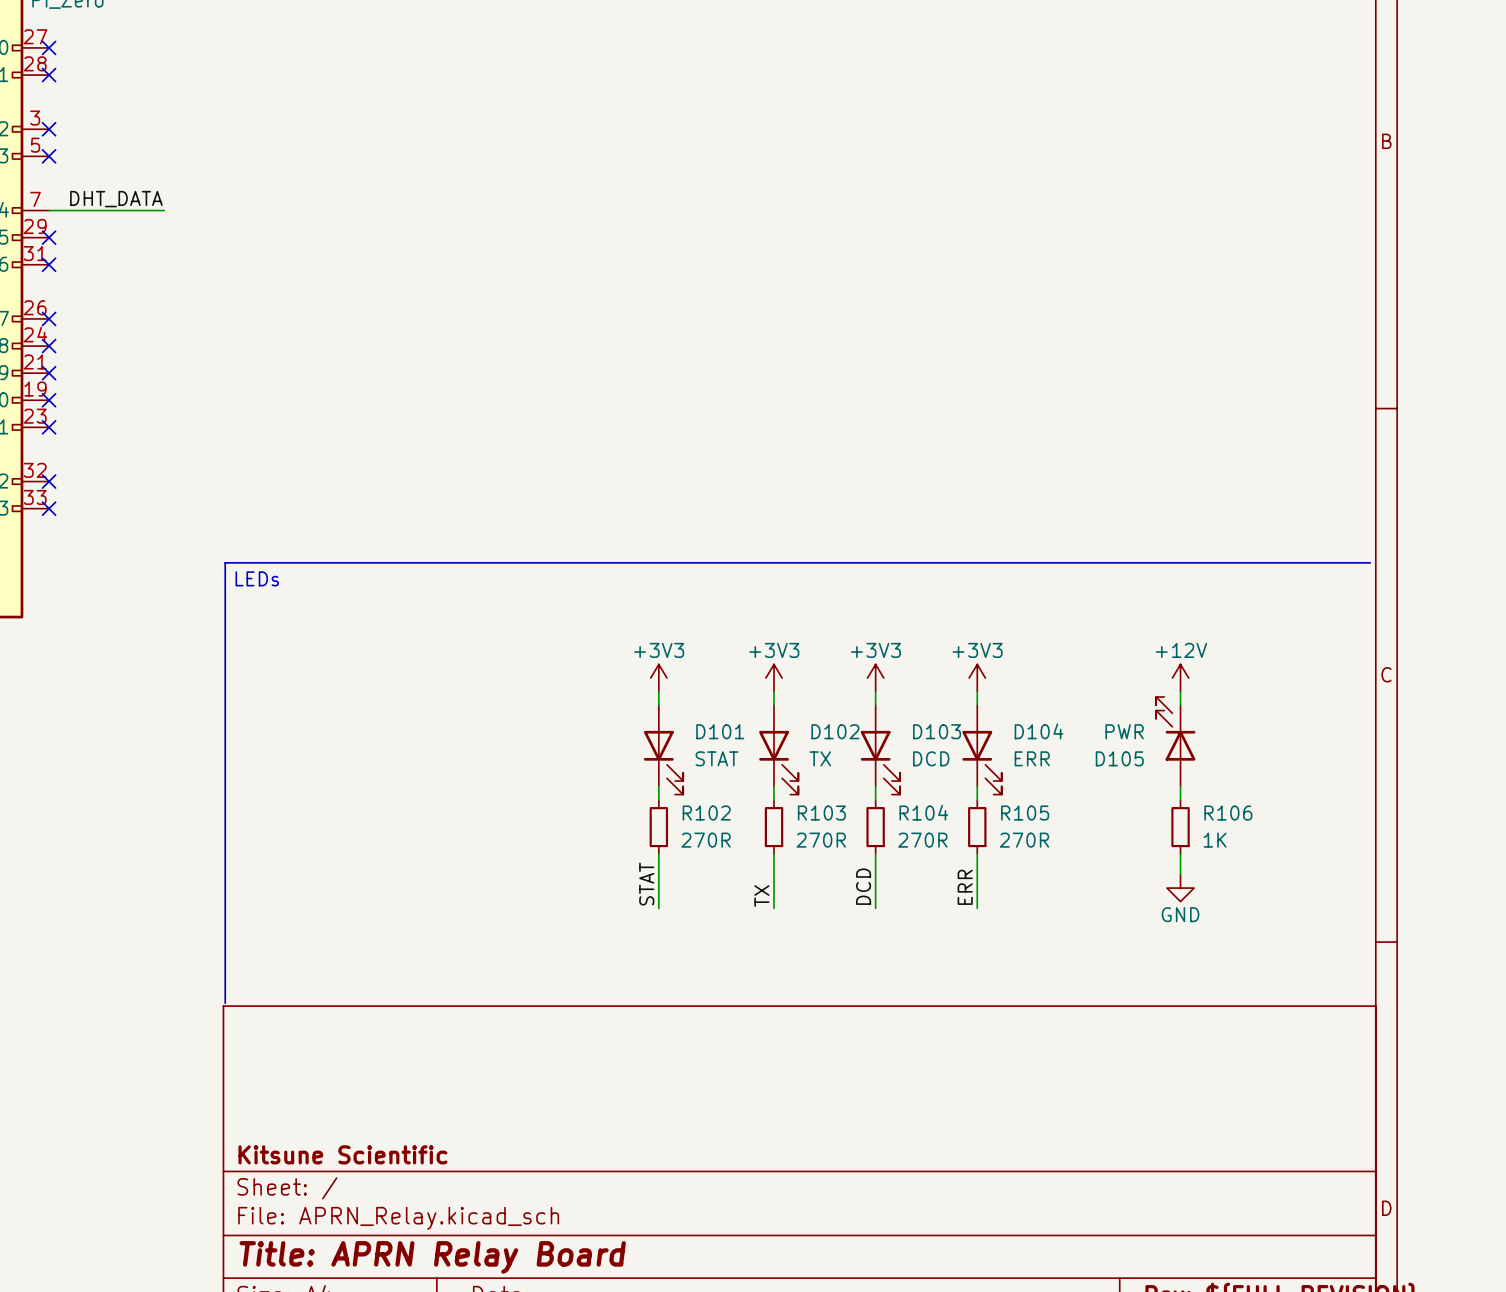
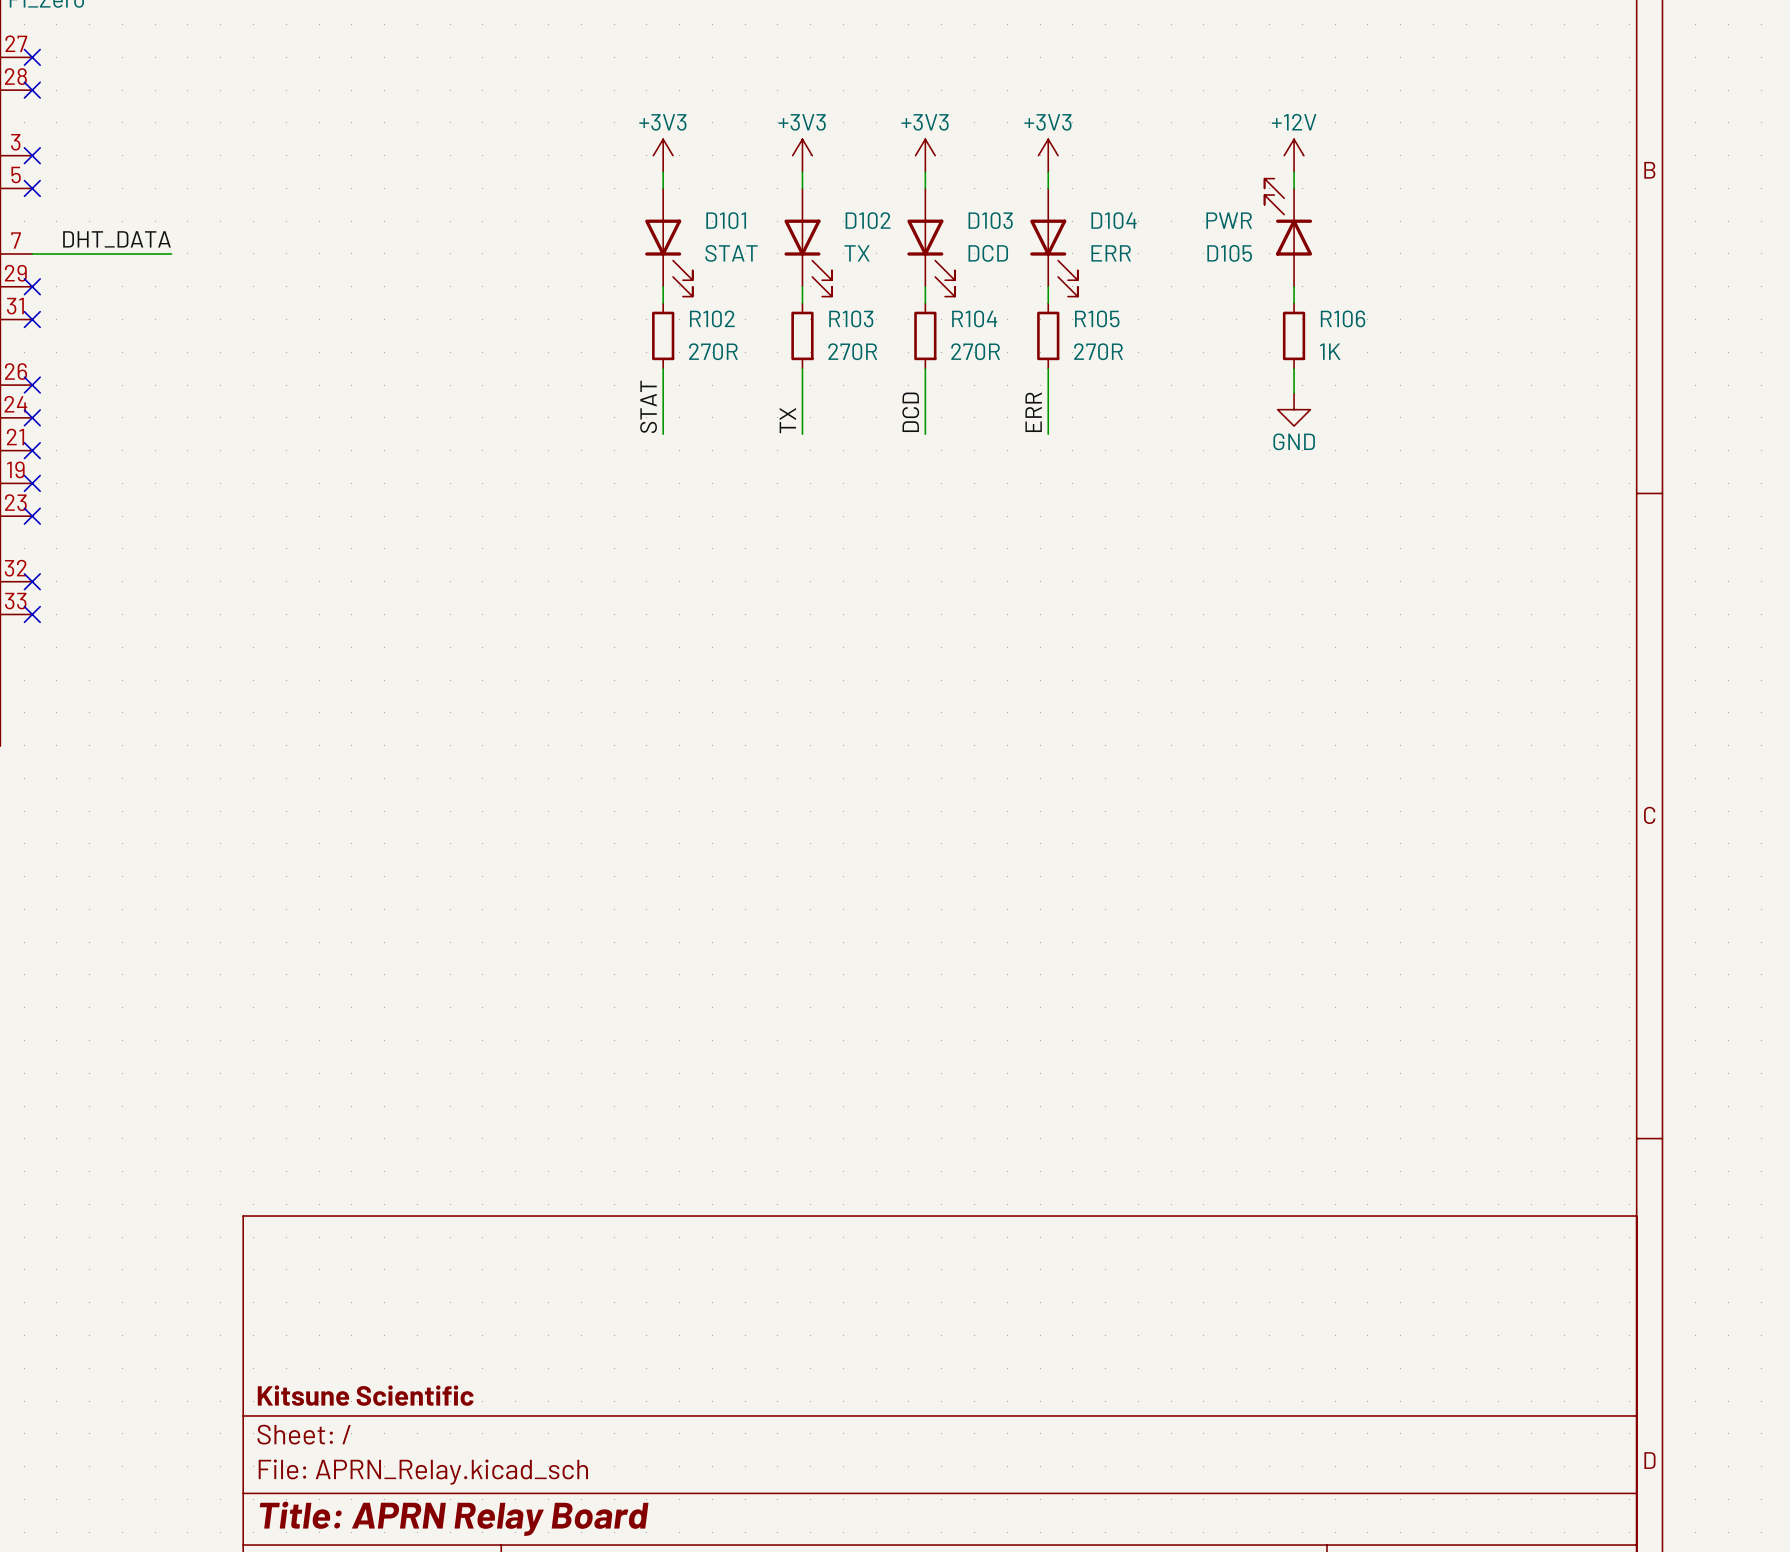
power symbol: none -> +3V3 (663, 155)
power symbol: none -> +3V3 (802, 155)
power symbol: none -> +3V3 (925, 155)
power symbol: none -> +3V3 (1048, 155)
power symbol: none -> +12V (1294, 155)
wire: none -> (663, 172) (663, 188)
wire: none -> (802, 172) (802, 188)
wire: none -> (925, 172) (925, 188)
wire: none -> (1048, 172) (1048, 188)
wire: none -> (1294, 172) (1294, 188)
wire: none -> (663, 286) (663, 303)
wire: none -> (802, 286) (802, 303)
wire: none -> (925, 286) (925, 303)
wire: none -> (1048, 286) (1048, 303)
wire: none -> (1294, 286) (1294, 303)
wire: none -> (663, 368) (663, 434)
wire: none -> (802, 368) (802, 434)
wire: none -> (925, 368) (925, 434)
wire: none -> (1048, 368) (1048, 434)
wire: none -> (1294, 368) (1294, 393)
label: none -> STAT (648, 406)
label: none -> DCD (910, 412)
label: none -> ERR (1033, 412)
power symbol: none -> GND (1294, 409)
label: none -> TX (787, 420)
line: (1370, 562) (225, 562) (225, 1003) -> none
text: LEDs (257, 578) -> none
power symbol: +3V3 (658, 678) -> none
power symbol: +3V3 (774, 678) -> none
power symbol: +3V3 (875, 678) -> none
power symbol: +3V3 (977, 678) -> none
power symbol: +12V (1180, 678) -> none
wire: (658, 691) (658, 705) -> none
wire: (774, 691) (774, 705) -> none
wire: (875, 691) (875, 705) -> none
wire: (977, 691) (977, 705) -> none
wire: (1180, 691) (1180, 705) -> none
D105 position: (1175, 741) -> (1288, 232)
D101 position: (663, 749) -> (668, 242)
D102 position: (778, 749) -> (808, 242)
D103 position: (880, 749) -> (931, 242)
D104 position: (982, 749) -> (1053, 242)
wire: (658, 786) (658, 799) -> none
wire: (774, 786) (774, 799) -> none
wire: (875, 786) (875, 799) -> none
wire: (977, 786) (977, 799) -> none
wire: (1180, 786) (1180, 799) -> none
R102 position: (658, 827) -> (663, 335)
R103 position: (774, 827) -> (802, 335)
R104 position: (875, 827) -> (925, 335)
R105 position: (977, 827) -> (1048, 335)
R106 position: (1180, 827) -> (1294, 335)
wire: (658, 854) (658, 908) -> none
wire: (774, 854) (774, 908) -> none
wire: (875, 854) (875, 908) -> none
wire: (977, 854) (977, 908) -> none
wire: (1180, 854) (1180, 874) -> none
label: STAT (646, 884) -> none
label: DCD (863, 886) -> none
label: ERR (965, 887) -> none
power symbol: GND (1180, 888) -> none
label: TX (761, 896) -> none

